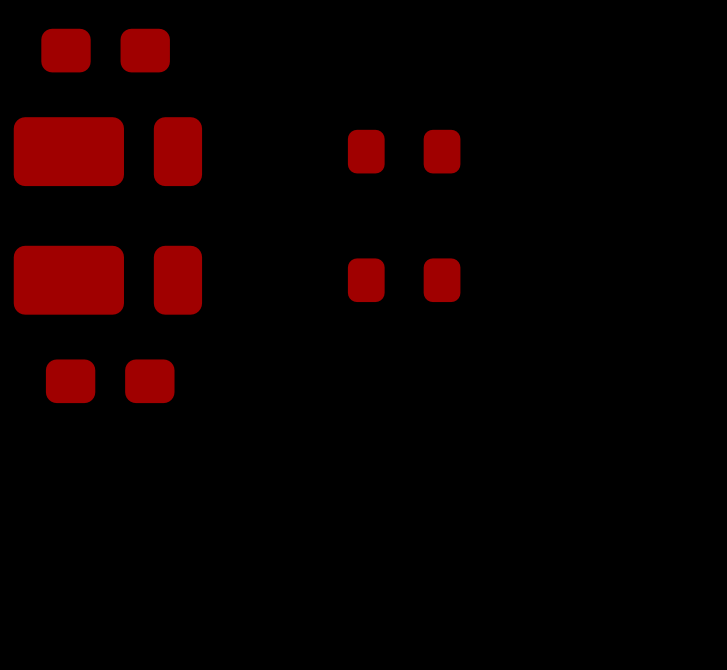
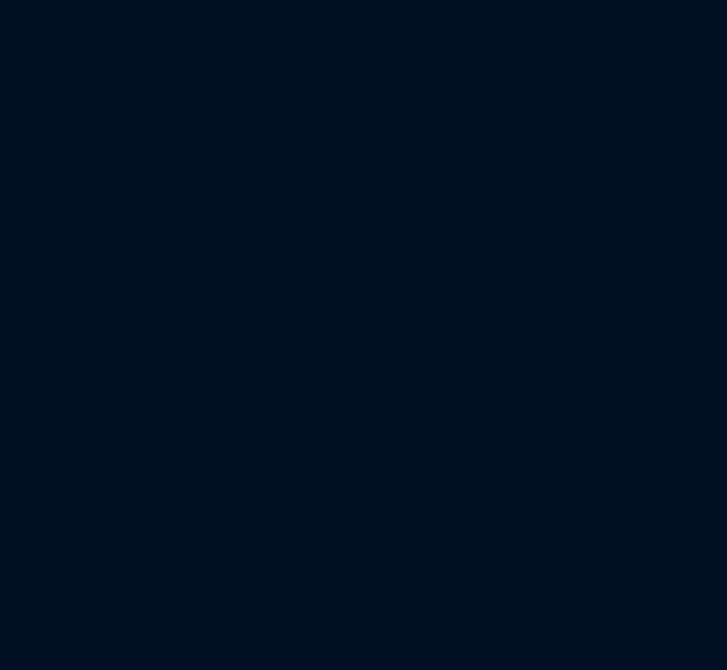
part: (105, 50) -> none
part: (107, 151) -> none
part: (404, 151) -> none
part: (107, 280) -> none
part: (404, 280) -> none
part: (110, 381) -> none

